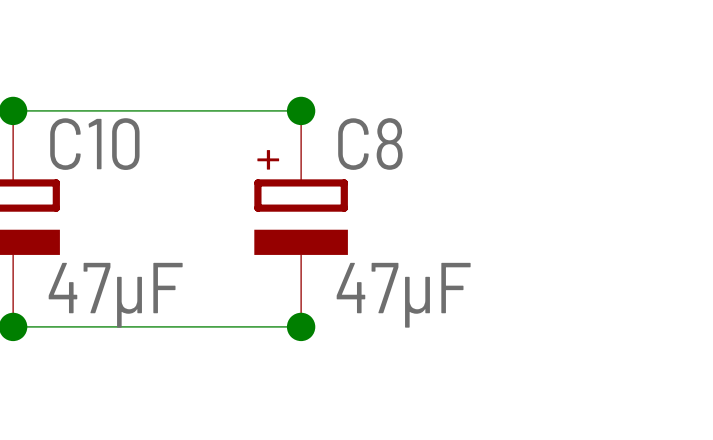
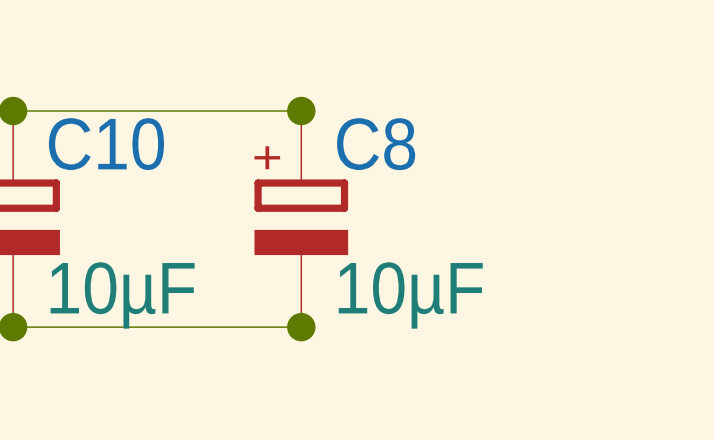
C10 value: 47µF (115, 295) -> 10µF (122, 295)
C8 value: 47µF (403, 295) -> 10µF (410, 295)

